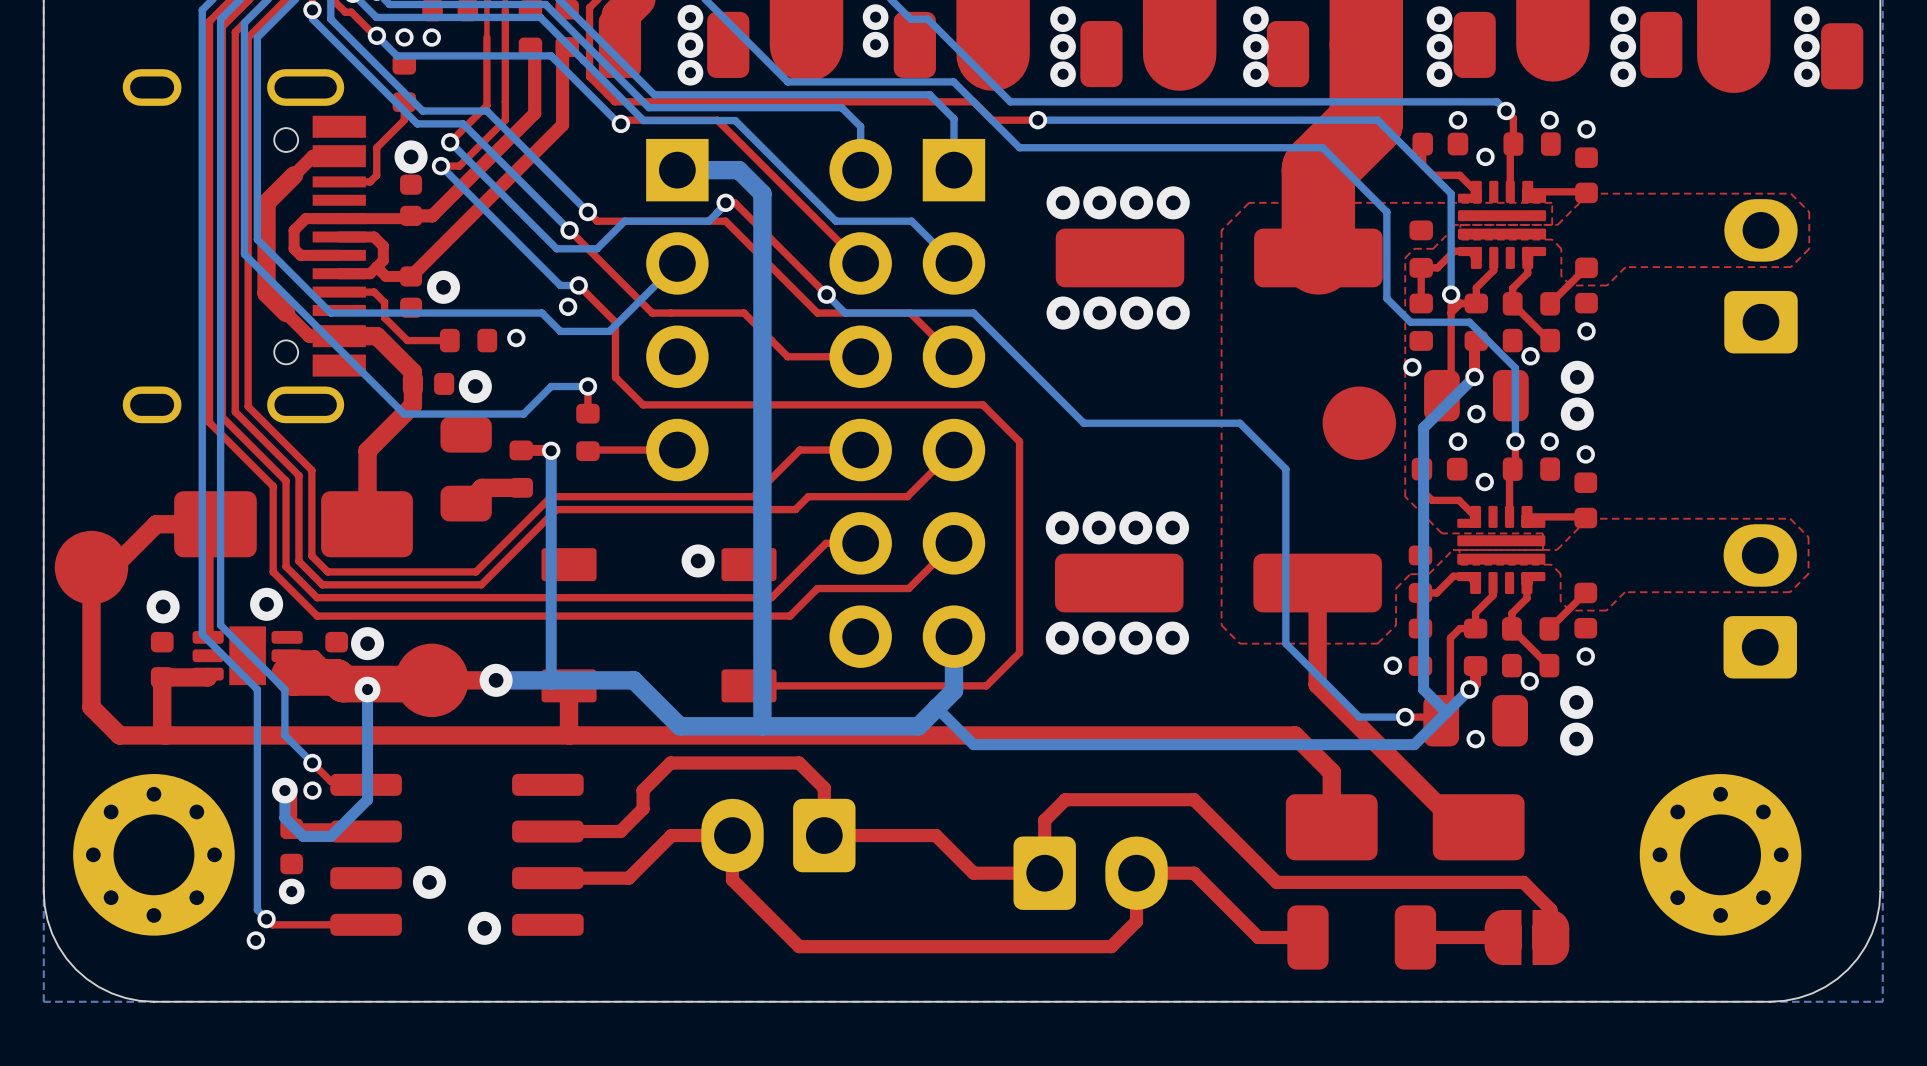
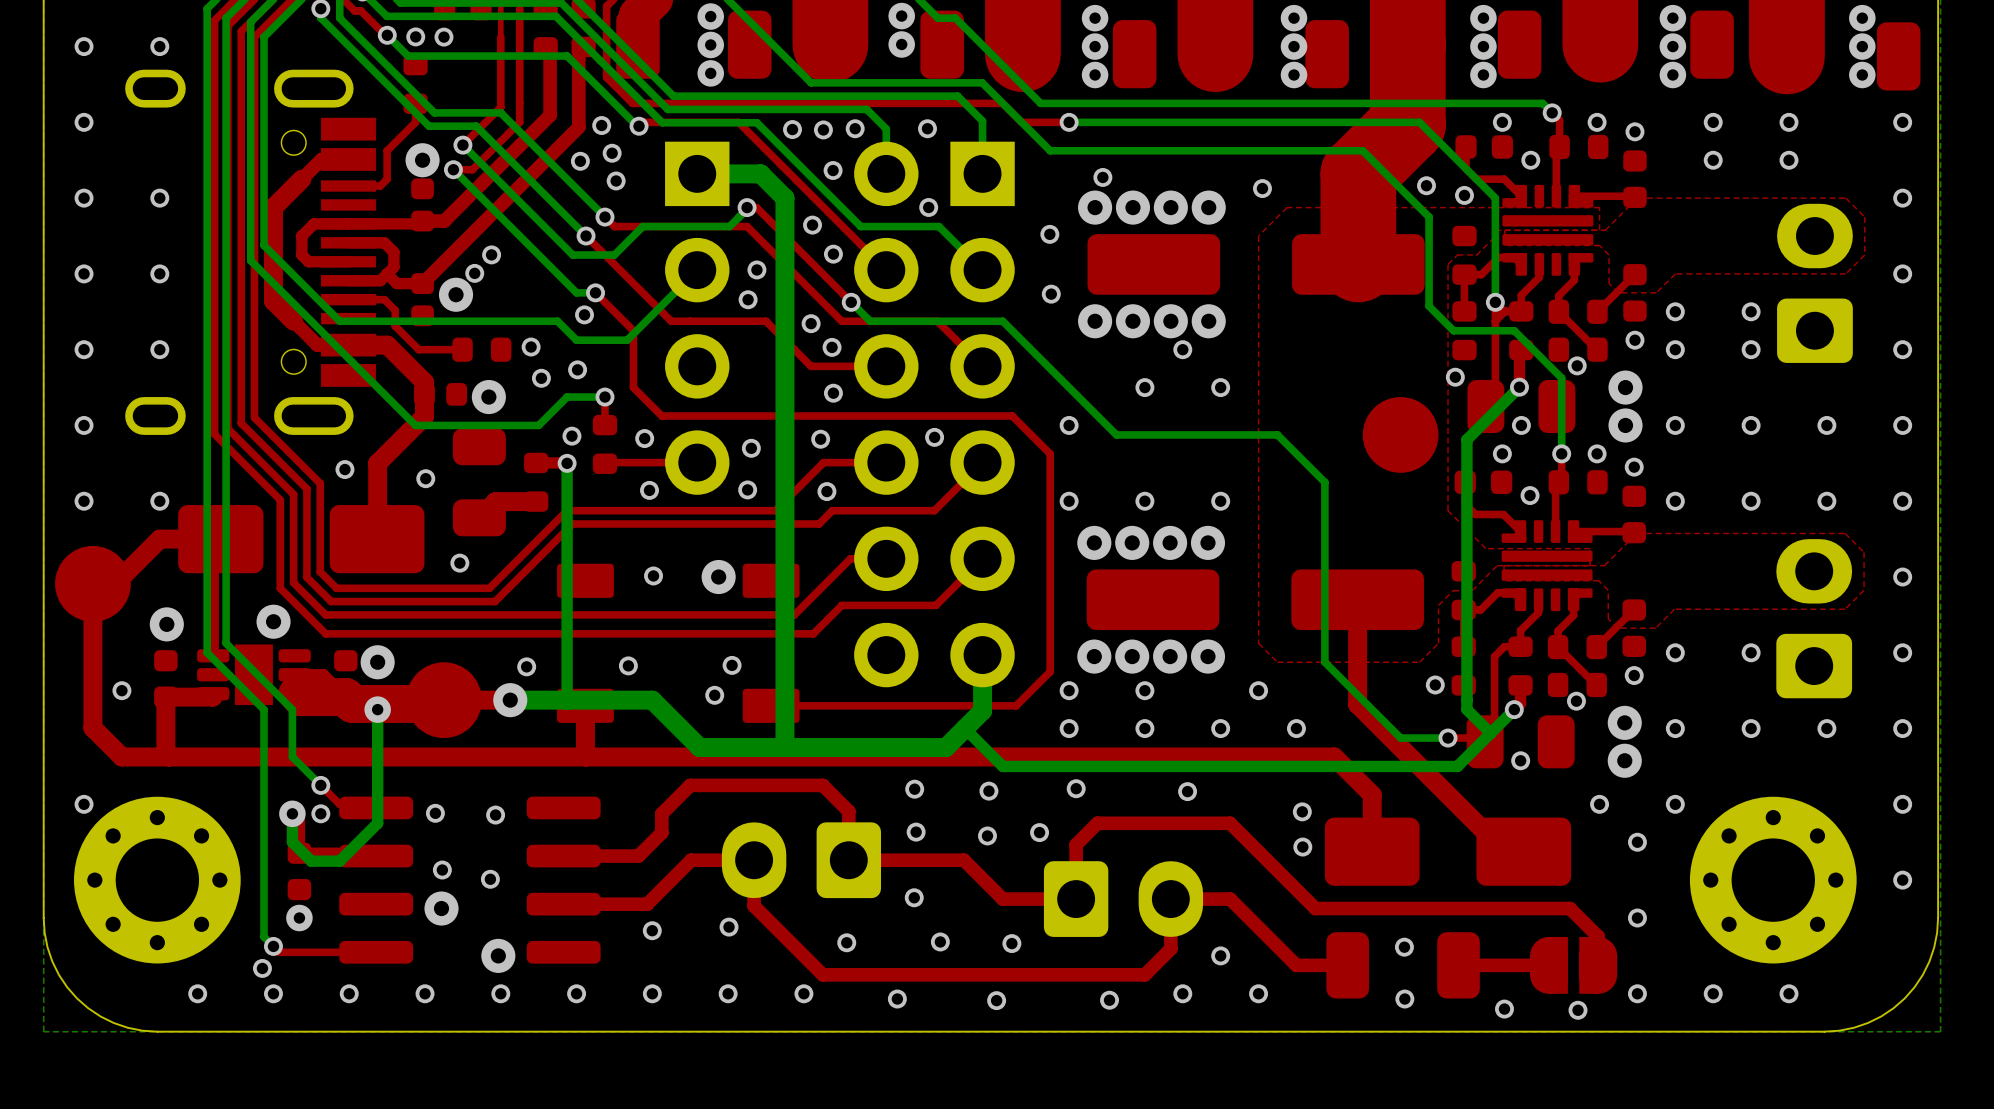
via: none -> (84, 46)
via: none -> (159, 46)
via: none -> (84, 122)
via: none -> (1713, 122)
via: none -> (1789, 122)
via: none -> (1902, 122)
via: none -> (601, 125)
via: none -> (855, 128)
via: none -> (927, 128)
via: none -> (792, 129)
via: none -> (823, 129)
via: none -> (612, 153)
via: none -> (1713, 160)
via: none -> (1789, 160)
via: none -> (580, 161)
via: none -> (833, 170)
via: none -> (1102, 177)
via: none -> (616, 180)
via: none -> (1426, 185)
via: none -> (1262, 188)
via: none -> (1464, 195)
via: none -> (84, 198)
via: none -> (159, 198)
via: none -> (1902, 198)
via: none -> (928, 207)
via: none -> (812, 225)
via: none -> (1049, 234)
via: none -> (833, 254)
via: none -> (491, 254)
via: none -> (756, 269)
via: none -> (474, 273)
via: none -> (84, 273)
via: none -> (159, 273)
via: none -> (1902, 273)
via: none -> (1051, 294)
via: none -> (748, 299)
via: none -> (1675, 311)
via: none -> (1751, 311)
via: none -> (811, 323)
via: none -> (832, 347)
via: none -> (84, 349)
via: none -> (159, 349)
via: none -> (1182, 349)
via: none -> (1675, 349)
via: none -> (1751, 349)
via: none -> (1902, 349)
via: none -> (577, 369)
via: none -> (541, 378)
via: none -> (1144, 387)
via: none -> (1220, 387)
via: none -> (833, 393)
via: none -> (84, 425)
via: none -> (1069, 425)
via: none -> (1675, 425)
via: none -> (1751, 425)
via: none -> (1826, 425)
via: none -> (1902, 425)
via: none -> (571, 436)
via: none -> (934, 437)
via: none -> (644, 438)
via: none -> (820, 439)
via: none -> (751, 448)
via: none -> (344, 469)
via: none -> (425, 478)
via: none -> (649, 490)
via: none -> (747, 489)
via: none -> (826, 491)
via: none -> (84, 501)
via: none -> (159, 501)
via: none -> (1069, 501)
via: none -> (1144, 501)
via: none -> (1220, 501)
via: none -> (1675, 501)
via: none -> (1751, 501)
via: none -> (1826, 501)
via: none -> (1902, 501)
via: none -> (459, 563)
via: none -> (653, 575)
via: none -> (1902, 577)
via: none -> (1675, 652)
via: none -> (1751, 652)
via: none -> (1902, 652)
via: none -> (732, 665)
via: none -> (628, 665)
via: none -> (526, 666)
via: none -> (121, 690)
via: none -> (1069, 690)
via: none -> (1144, 690)
via: none -> (1258, 690)
via: none -> (714, 695)
via: none -> (1069, 728)
via: none -> (1144, 728)
via: none -> (1220, 728)
via: none -> (1296, 728)
via: none -> (1675, 728)
via: none -> (1751, 728)
via: none -> (1826, 728)
via: none -> (1902, 728)
via: none -> (914, 789)
via: none -> (1076, 788)
via: none -> (988, 791)
via: none -> (1187, 791)
via: none -> (84, 804)
via: none -> (1599, 804)
via: none -> (1675, 804)
via: none -> (1902, 804)
via: none -> (1302, 811)
via: none -> (435, 813)
via: none -> (495, 815)
via: none -> (916, 832)
via: none -> (1039, 832)
via: none -> (987, 835)
via: none -> (1637, 842)
via: none -> (1302, 847)
via: none -> (442, 870)
via: none -> (490, 879)
via: none -> (1902, 880)
via: none -> (914, 897)
via: none -> (1637, 918)
via: none -> (729, 927)
via: none -> (652, 930)
via: none -> (940, 941)
via: none -> (846, 942)
via: none -> (1011, 943)
via: none -> (1404, 947)
via: none -> (1220, 955)
via: none -> (197, 993)
via: none -> (273, 993)
via: none -> (349, 993)
via: none -> (425, 993)
via: none -> (500, 993)
via: none -> (576, 993)
via: none -> (652, 993)
via: none -> (728, 993)
via: none -> (803, 993)
via: none -> (1182, 993)
via: none -> (1258, 993)
via: none -> (1637, 993)
via: none -> (1713, 993)
via: none -> (1789, 993)
via: none -> (897, 999)
via: none -> (1404, 999)
via: none -> (996, 1000)
via: none -> (1109, 1000)
via: none -> (1504, 1009)
via: none -> (1578, 1010)

